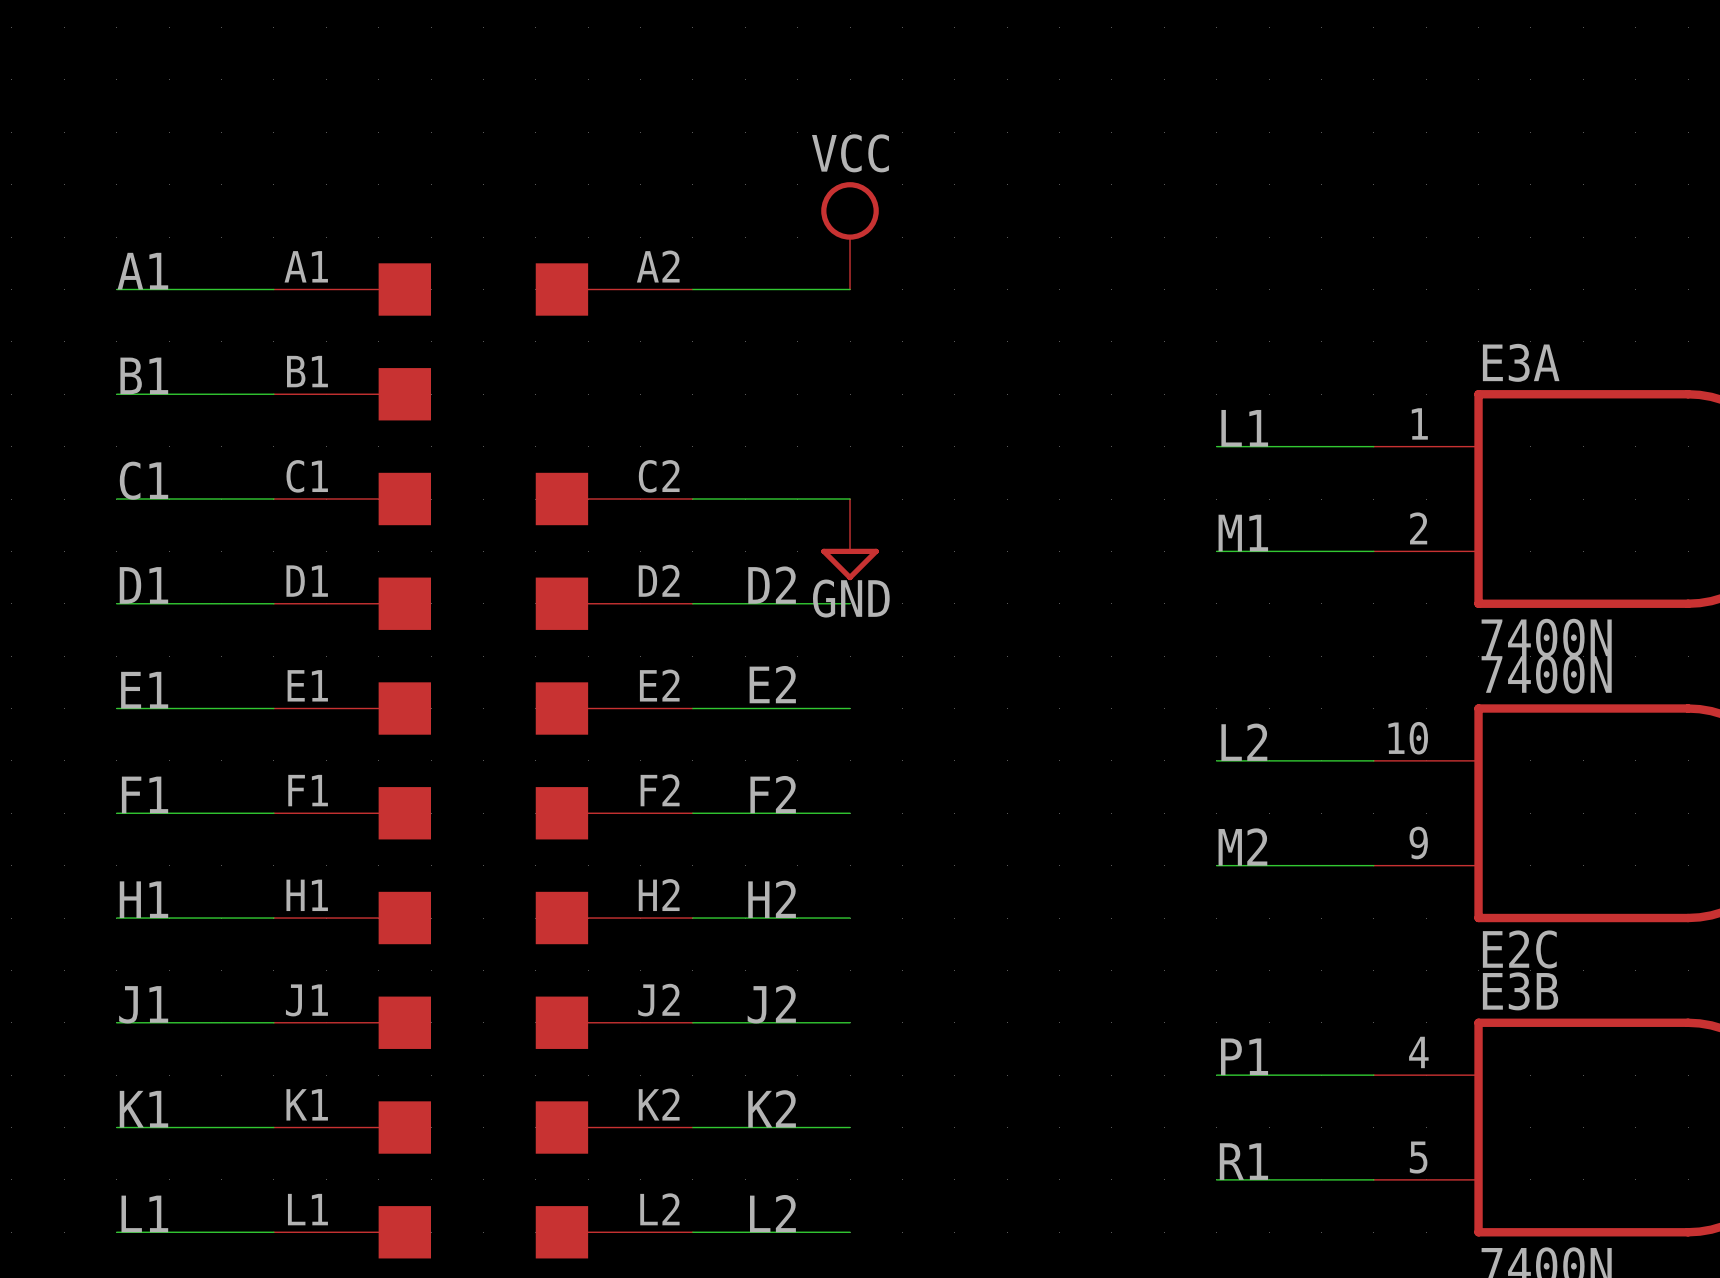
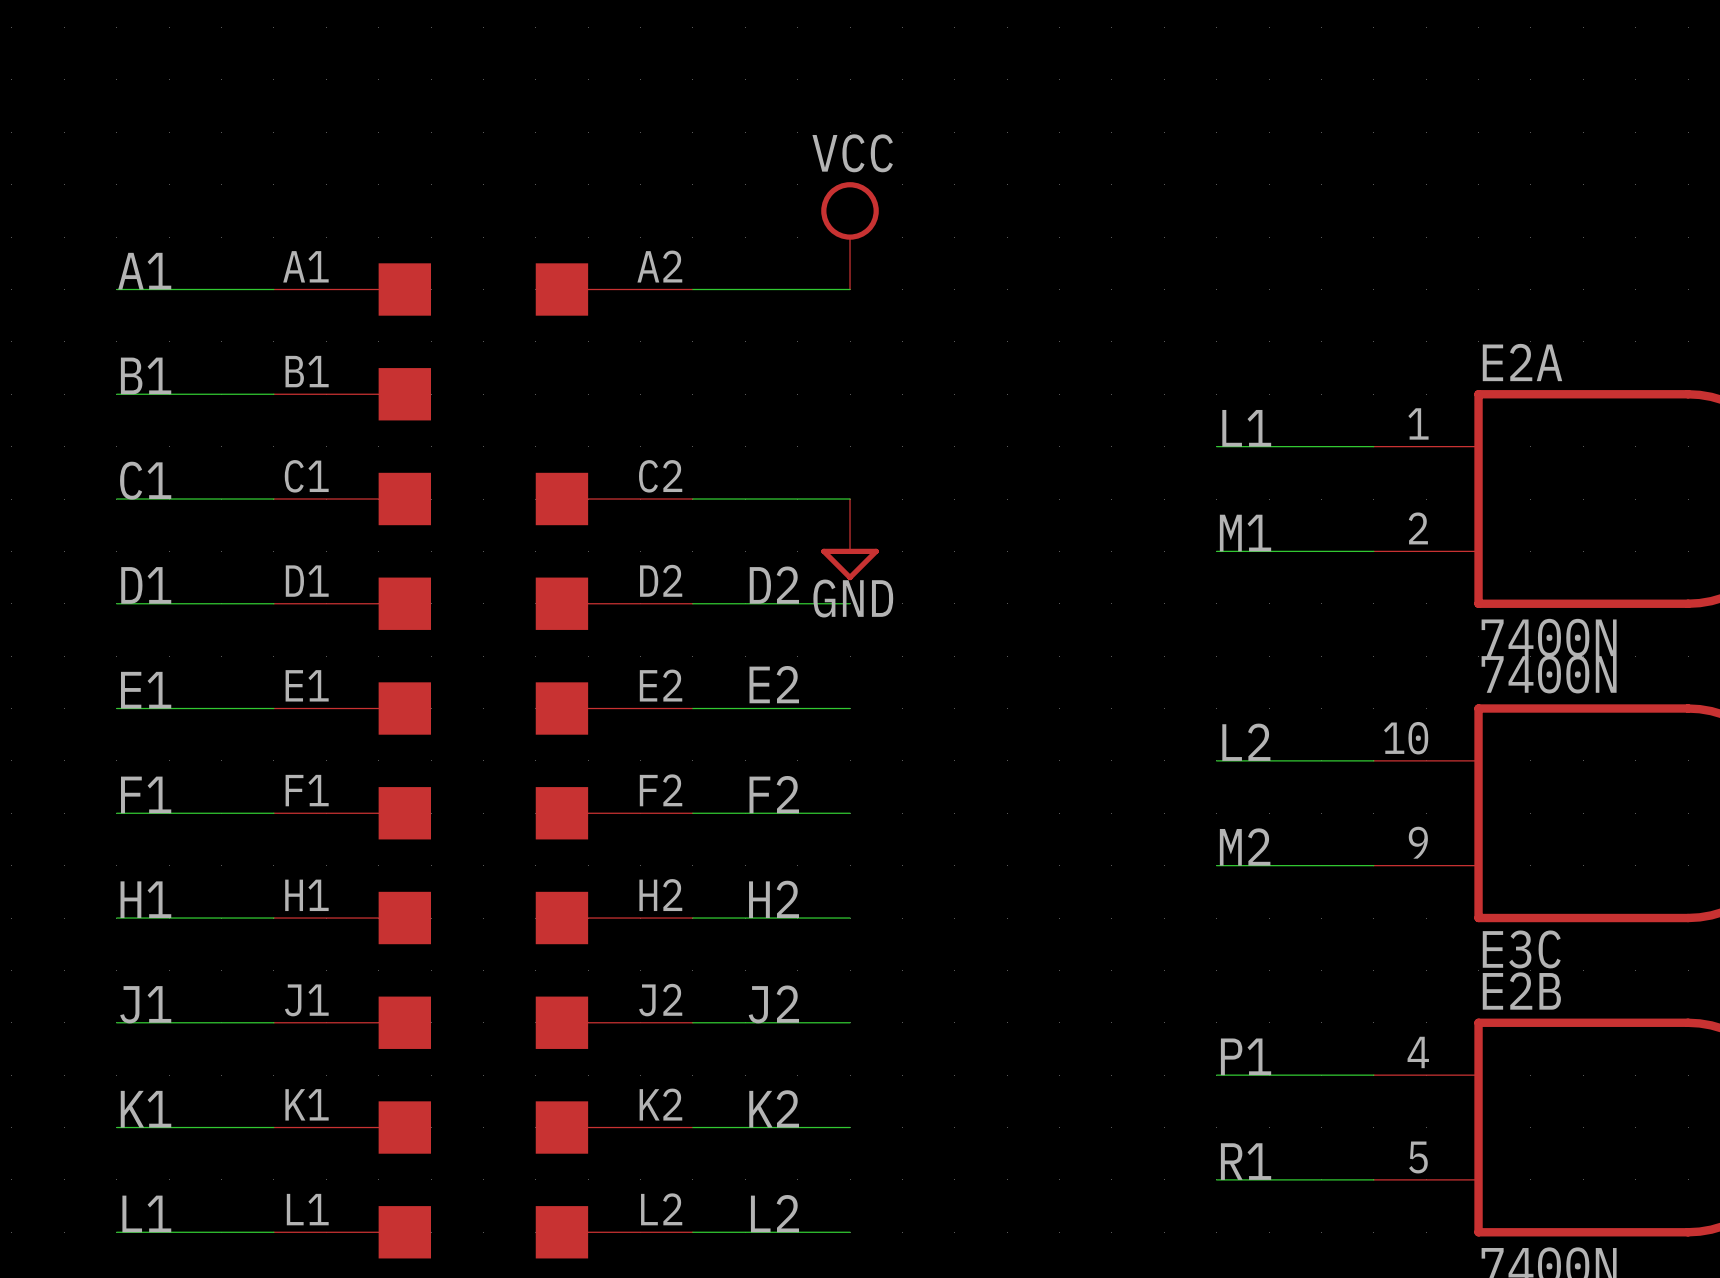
E3A name: E3A (1521, 362) -> E2A (1522, 362)
E2C name: E2C (1519, 949) -> E3C (1521, 949)
E3B name: E3B (1520, 991) -> E2B (1521, 991)

